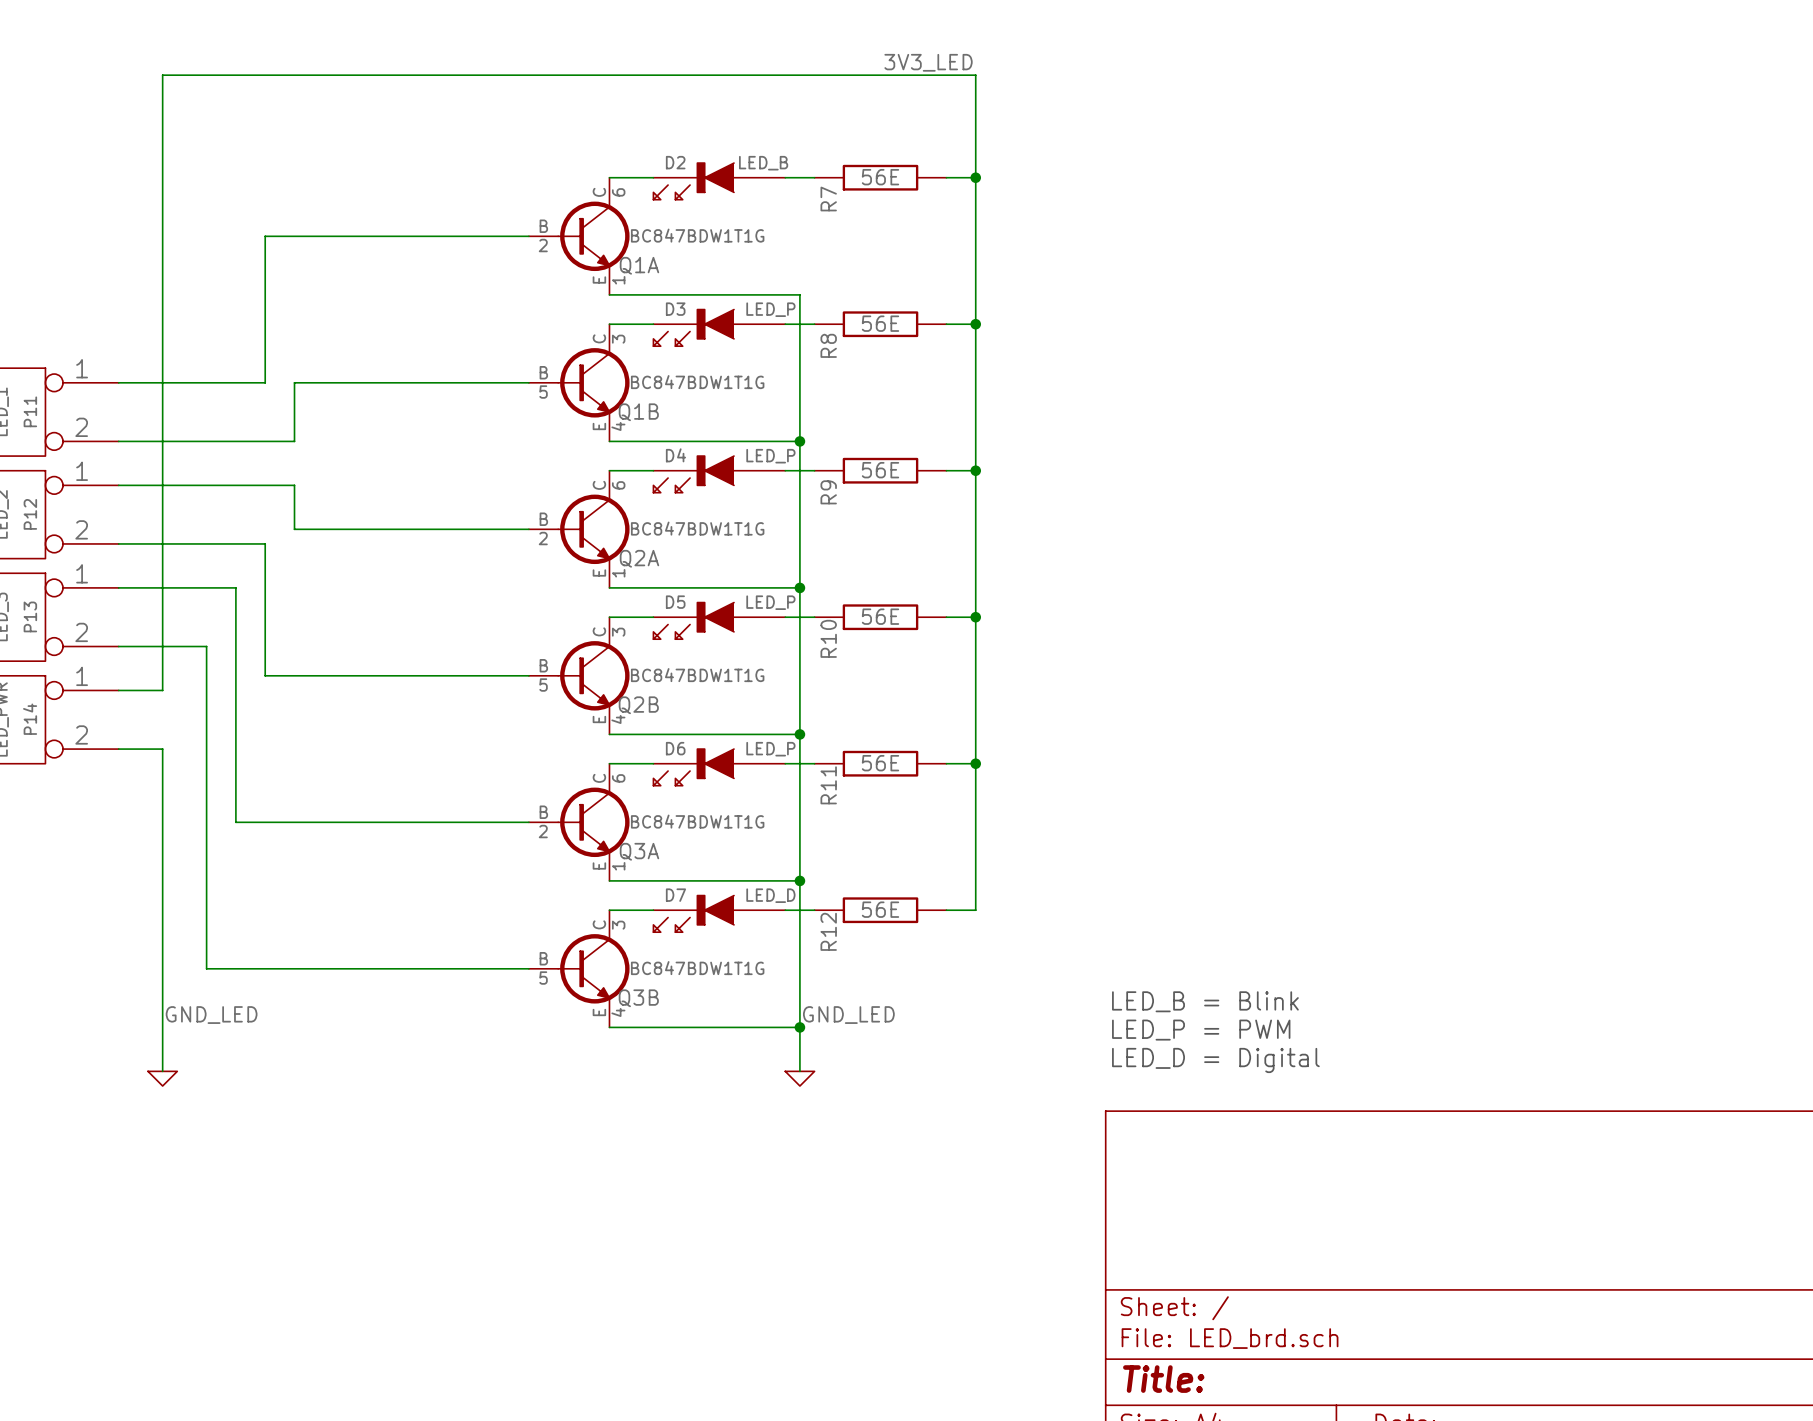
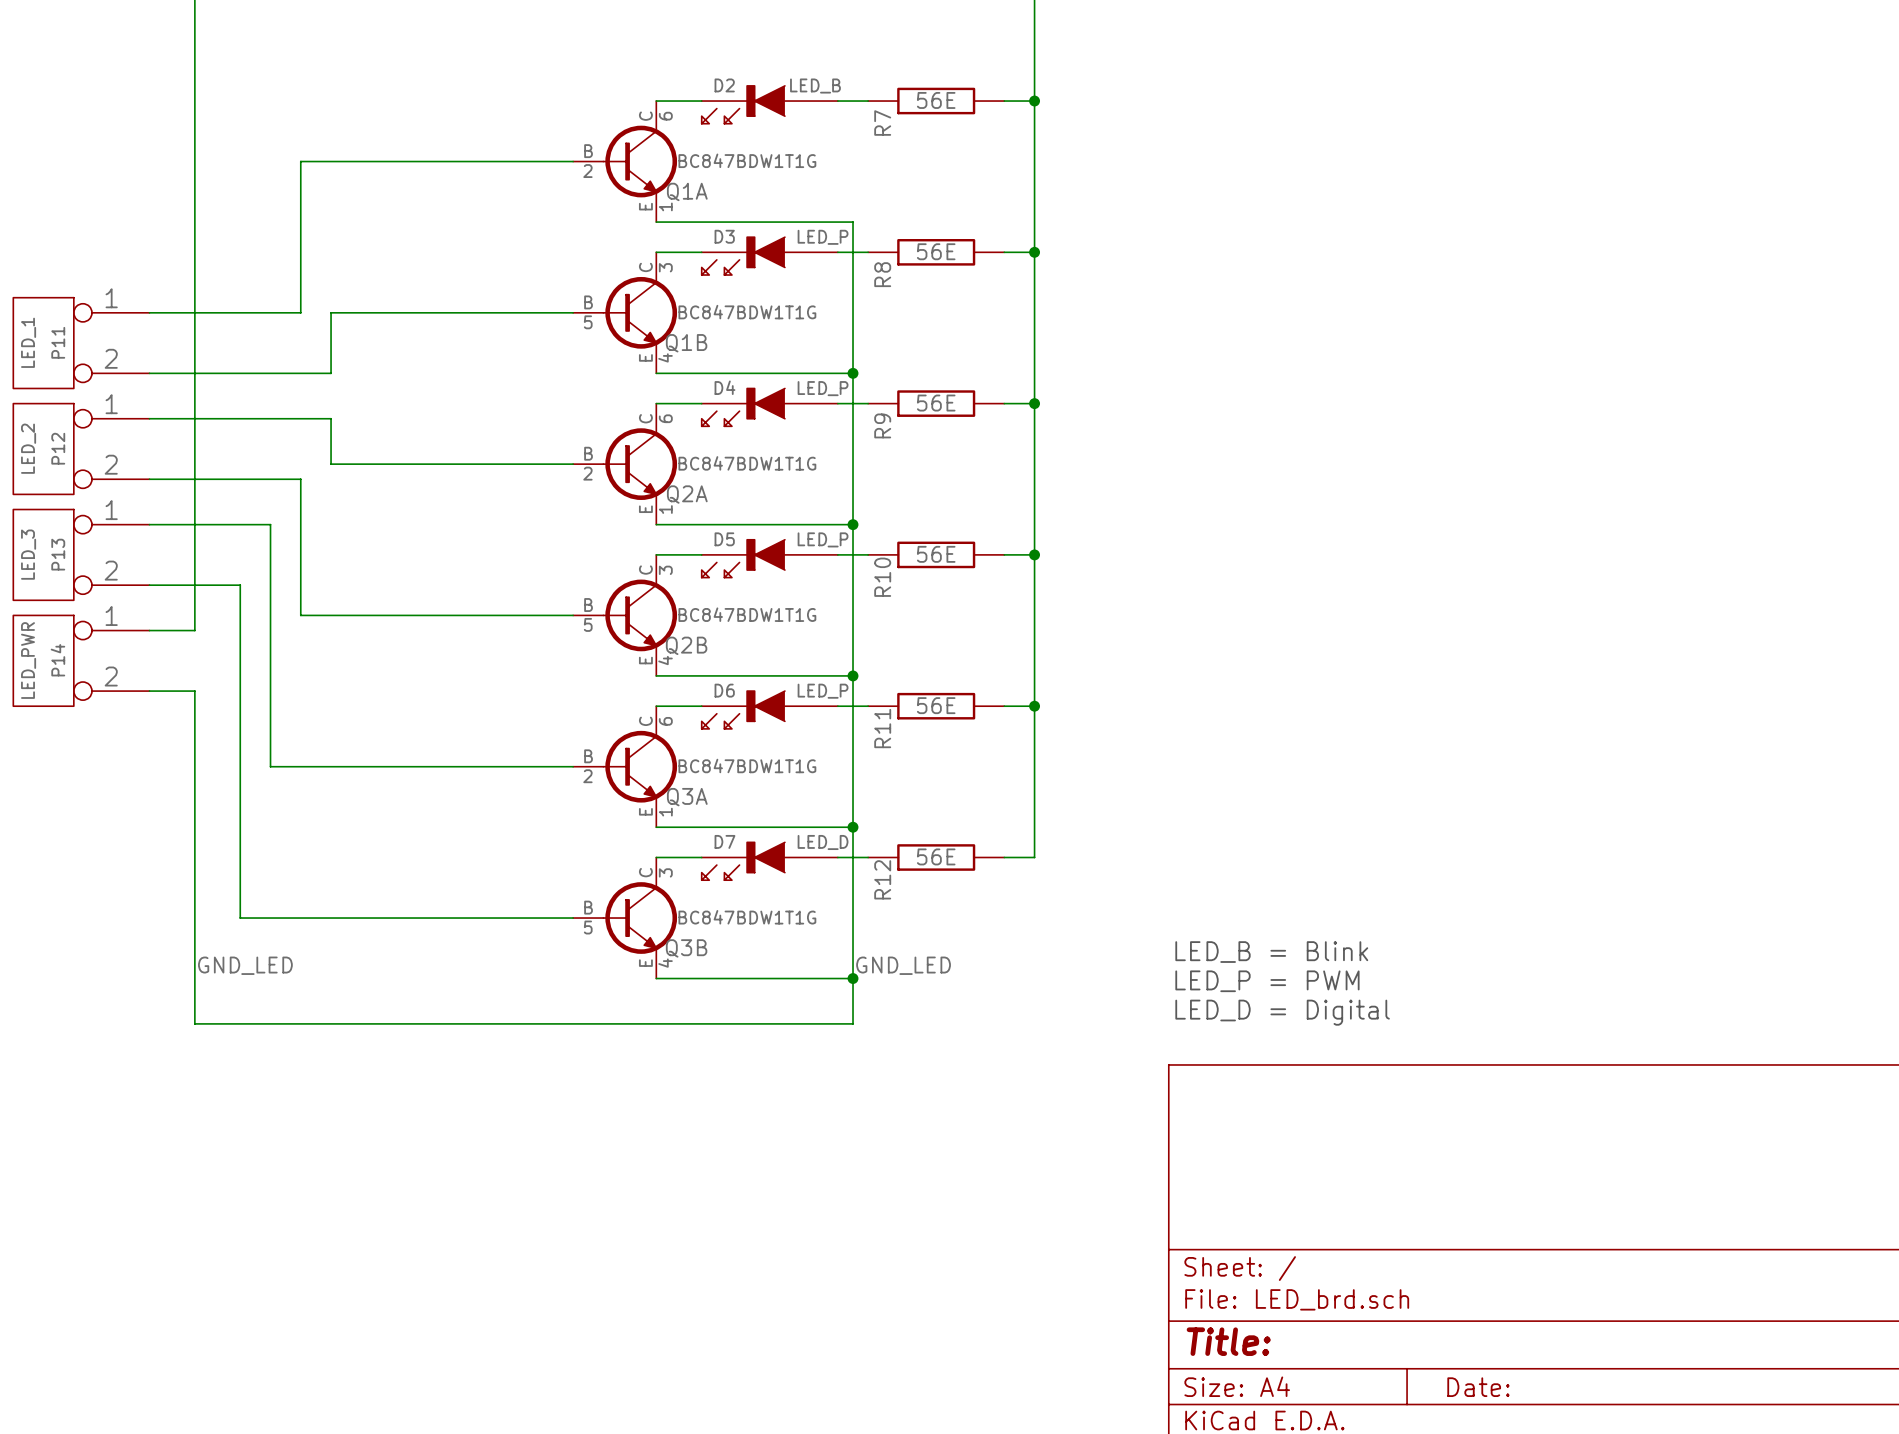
wire: none -> (194, 1023) (853, 1023)
power symbol: (162, 1078) -> none
power symbol: (799, 1078) -> none

